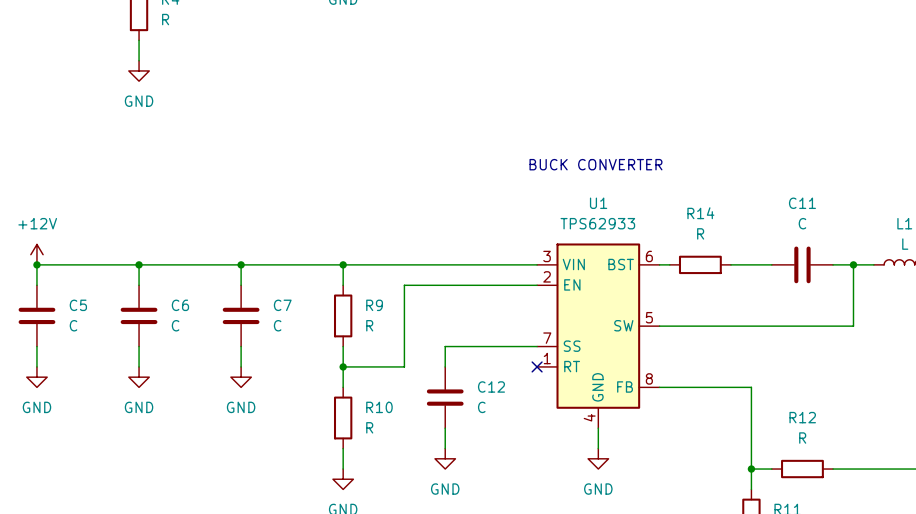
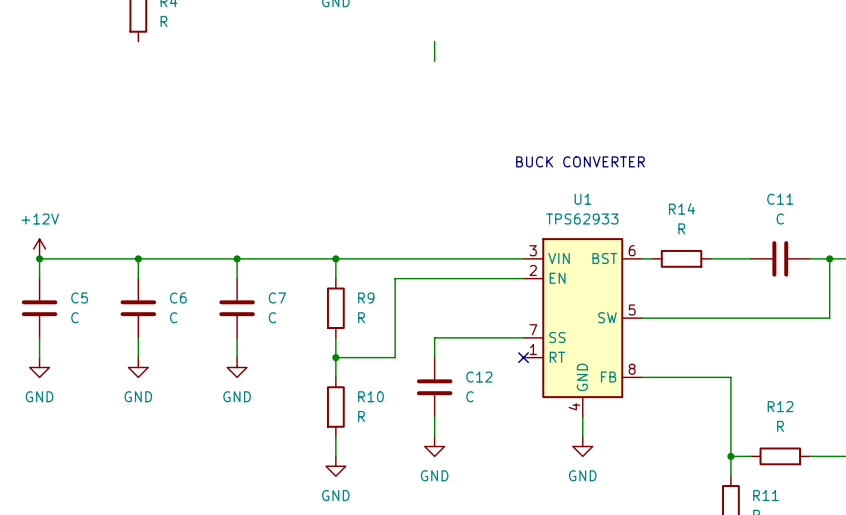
wire: (139, 40) (139, 60) -> none
wire: none -> (434, 41) (434, 61)
power symbol: GND (139, 70) -> none

